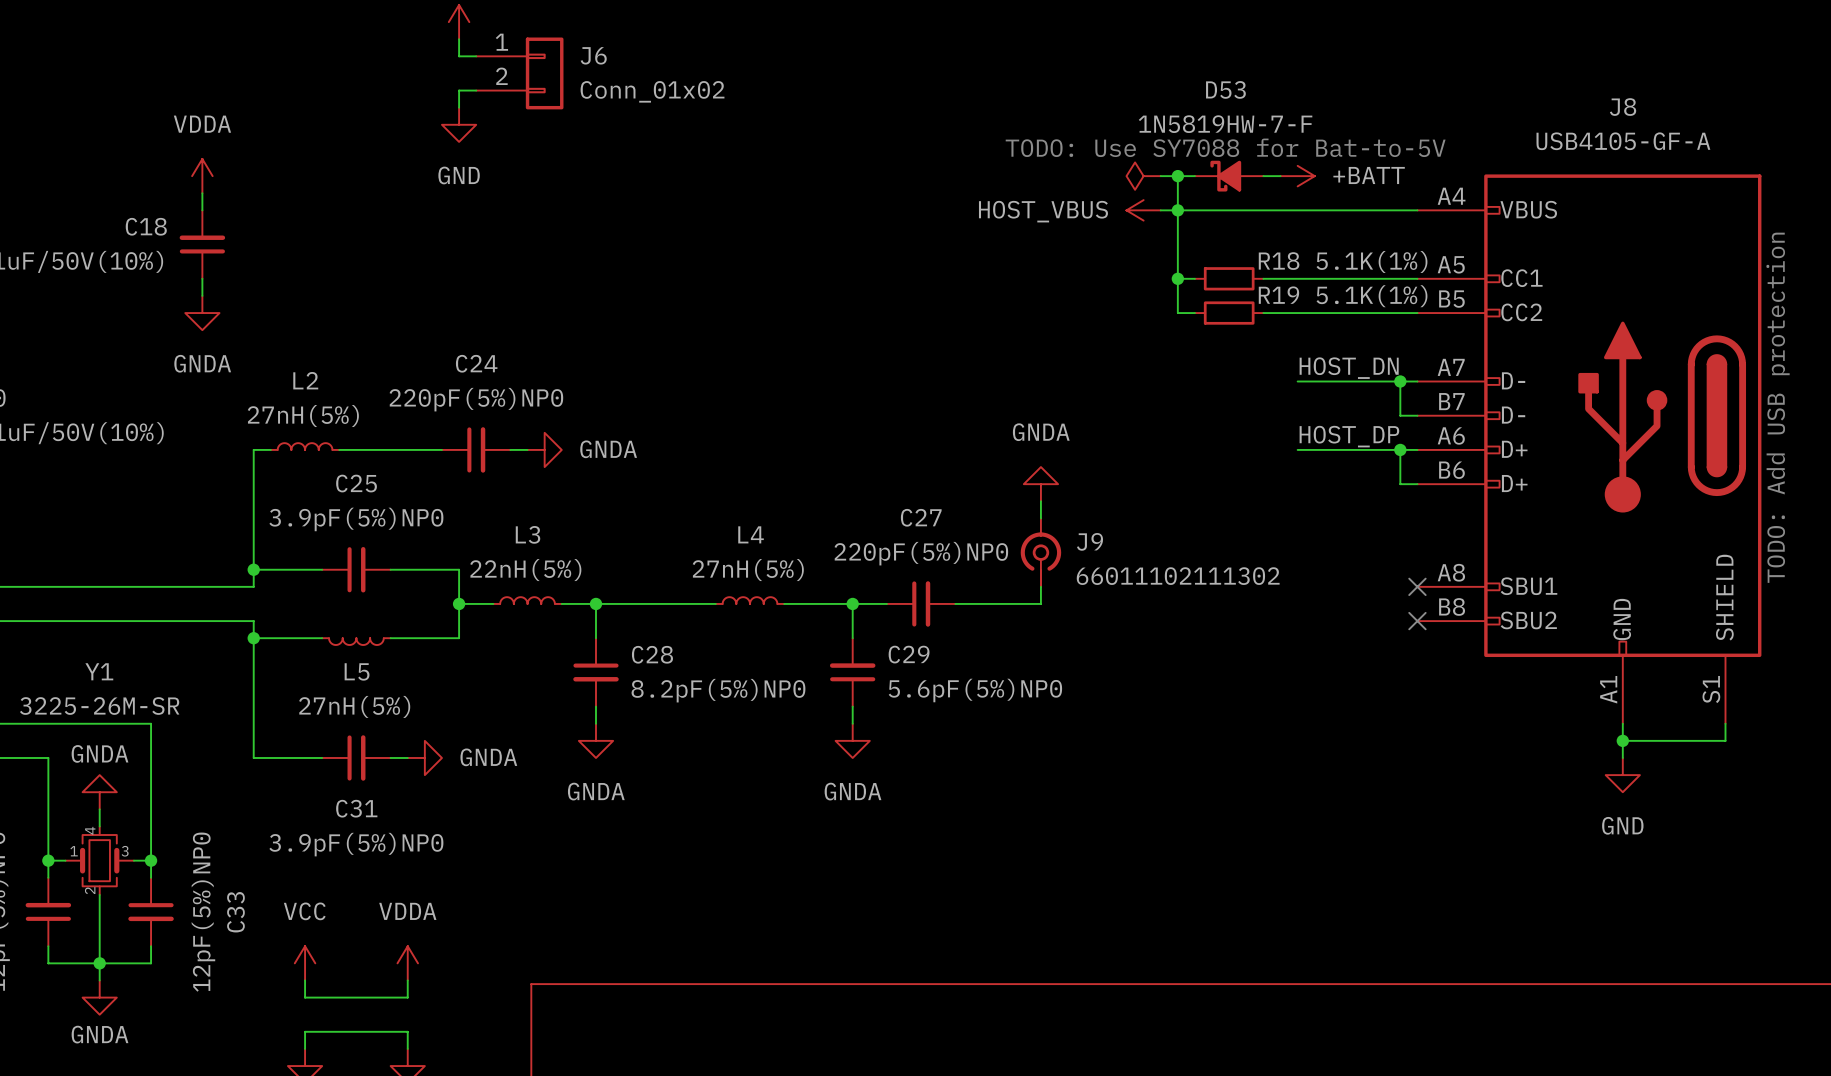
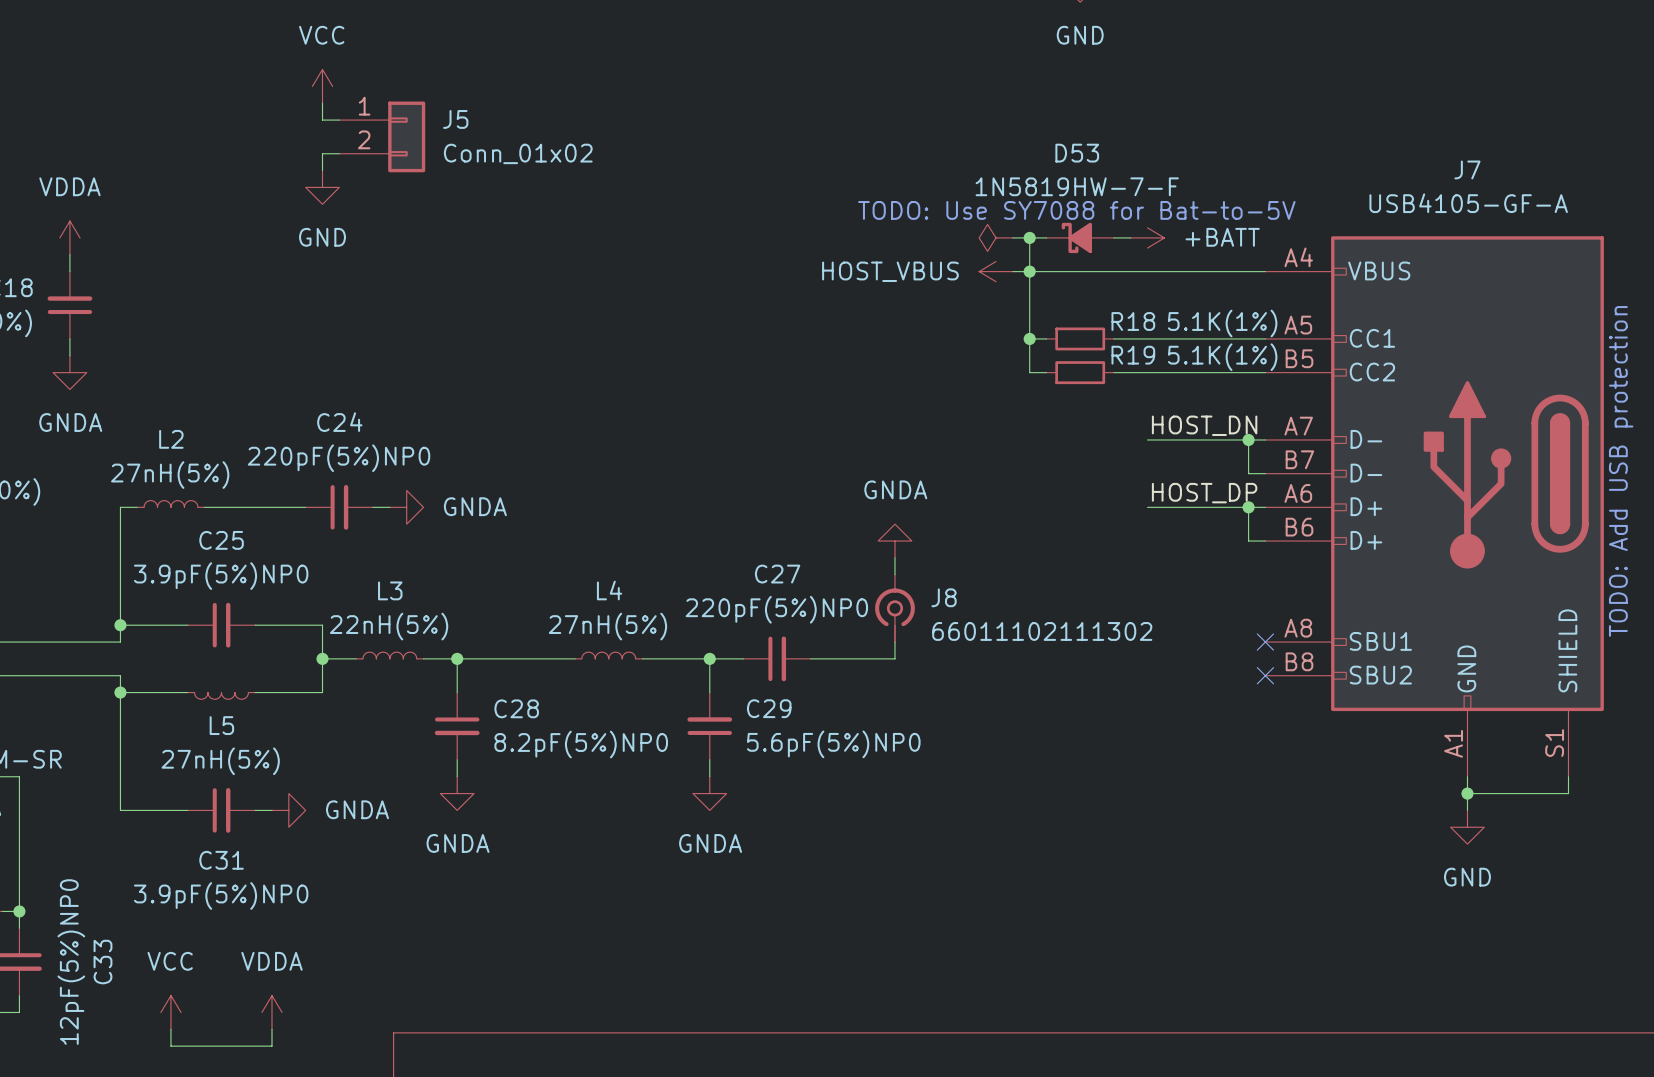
J6 name: J6 (593, 55) -> J5 (455, 119)
J8 name: J8 (1623, 107) -> J7 (1467, 169)
J9 name: J9 (1090, 541) -> J8 (944, 597)

